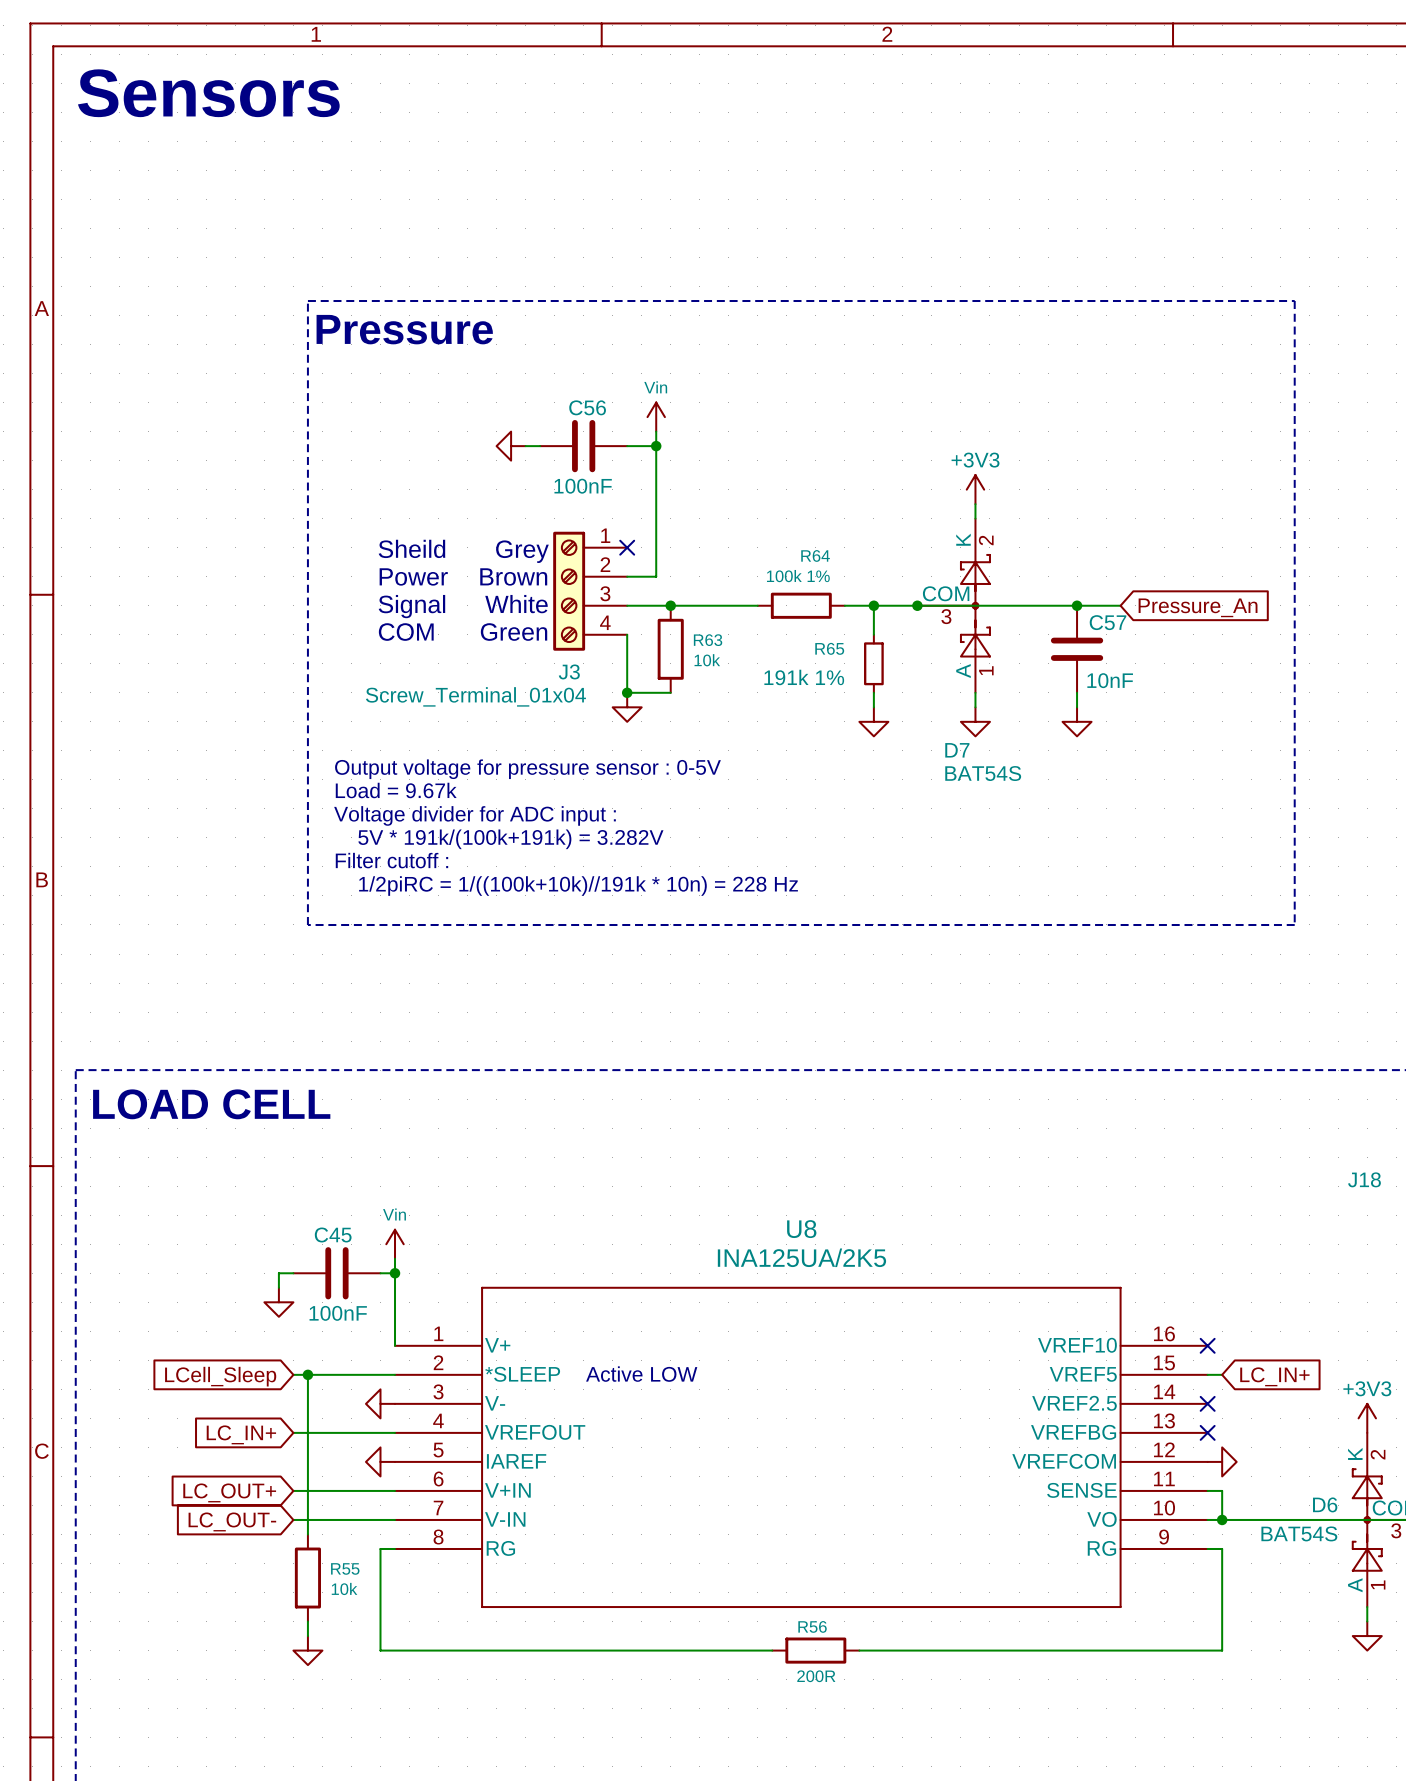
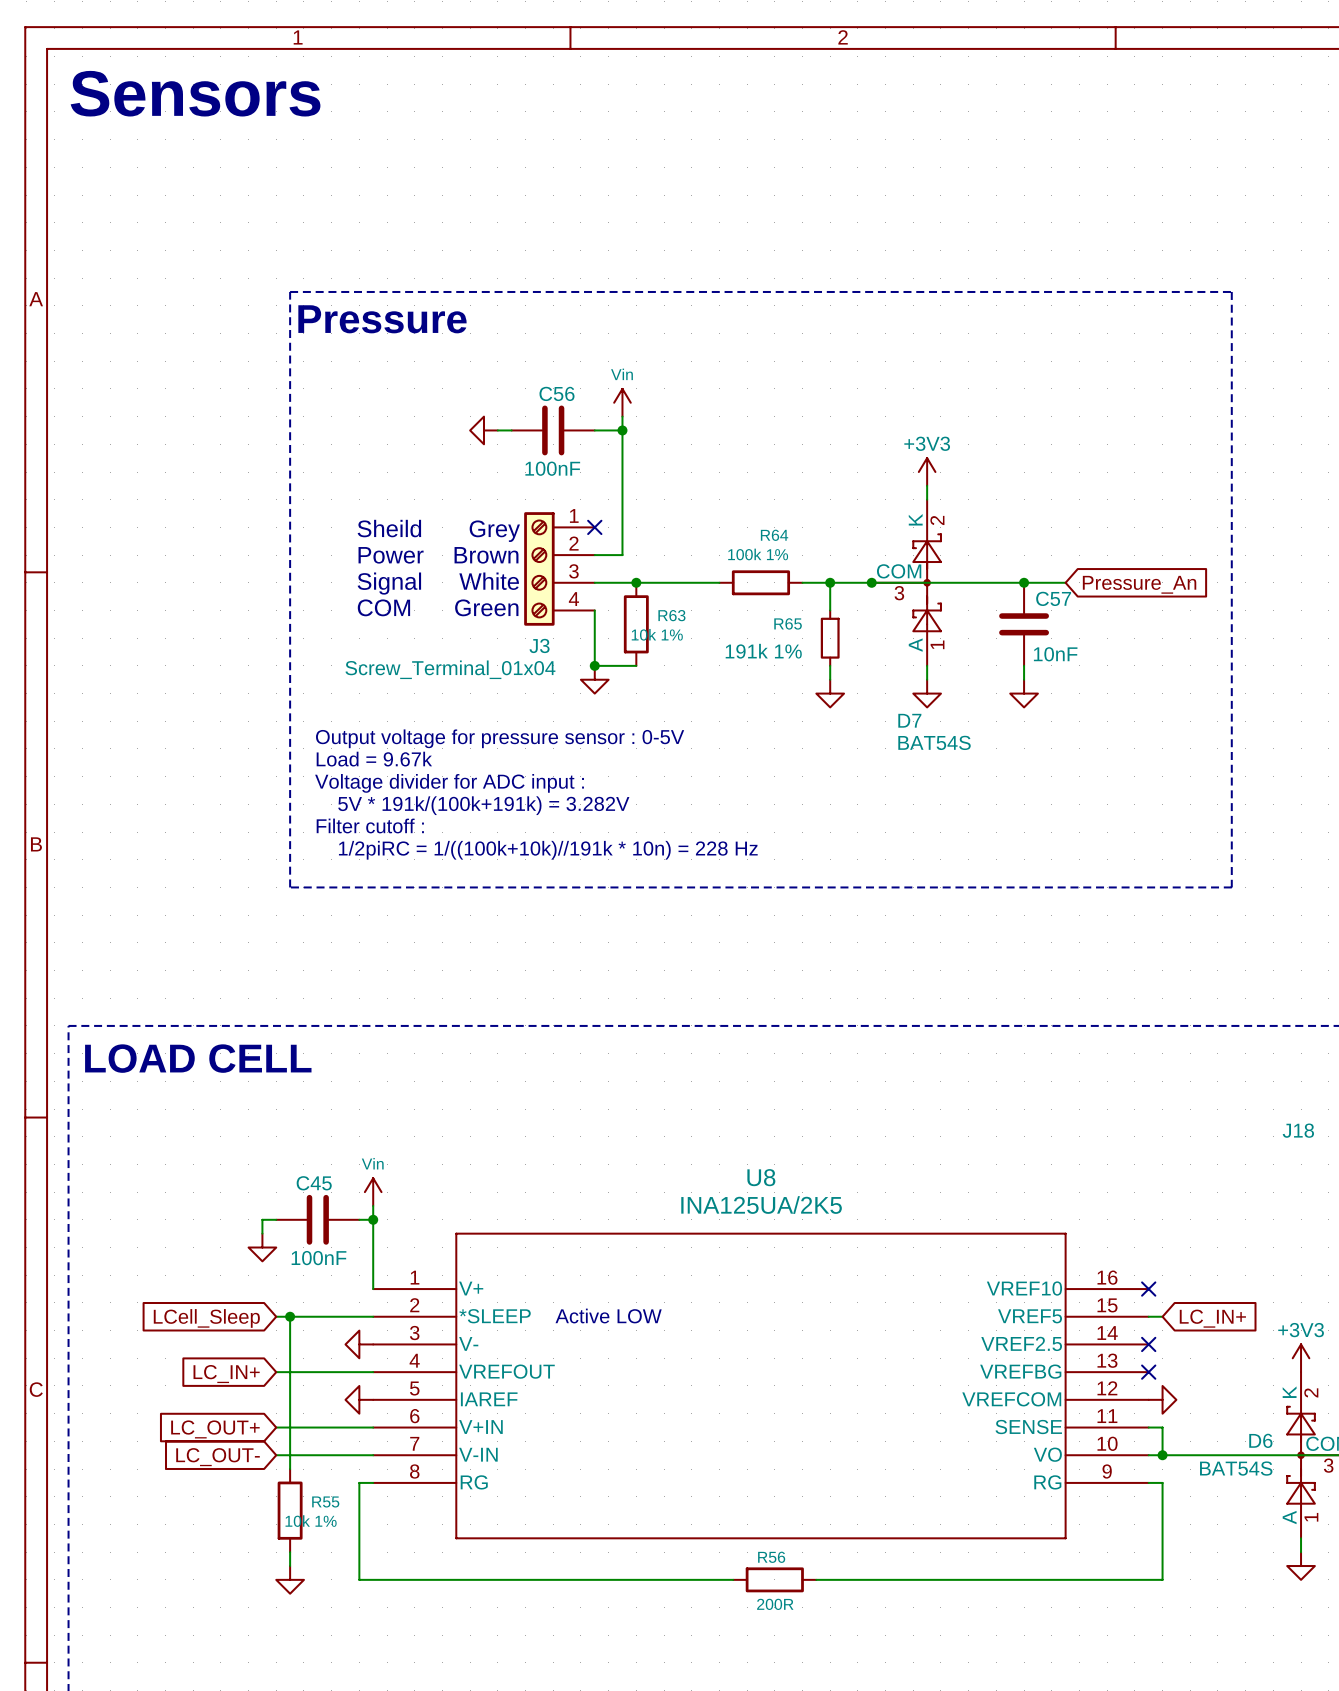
R63 value: 10k (707, 660) -> 10k 1% (657, 634)
R55 value: 10k (344, 1588) -> 10k 1% (311, 1521)

